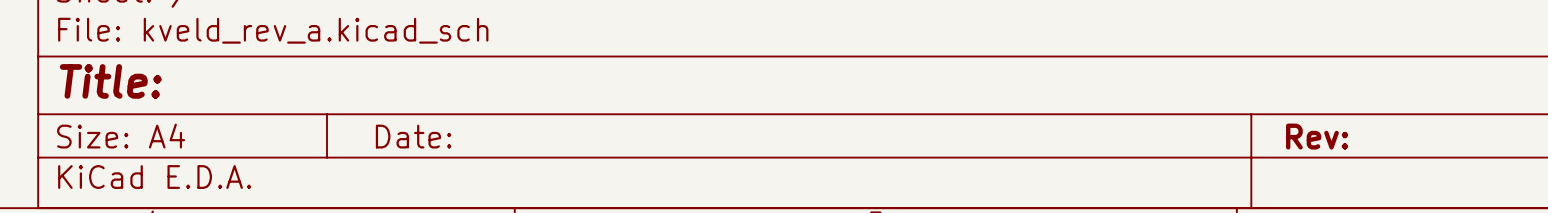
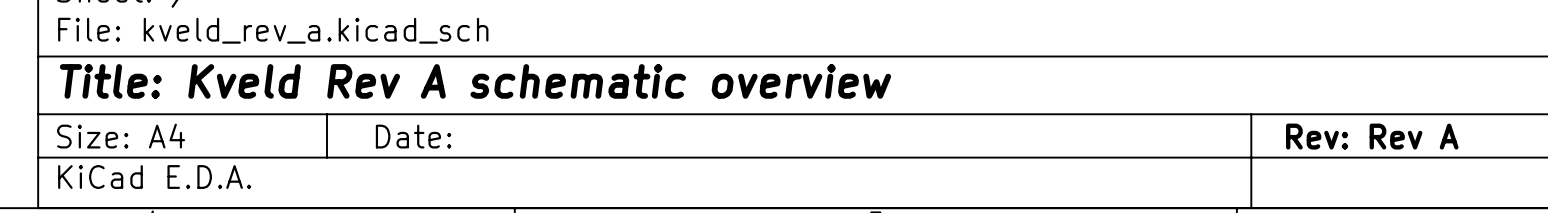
title block: Title: (110, 81) -> Title: Kveld Rev A schematic overview (475, 81)
title block: Rev: (1317, 136) -> Rev: Rev A (1372, 136)

